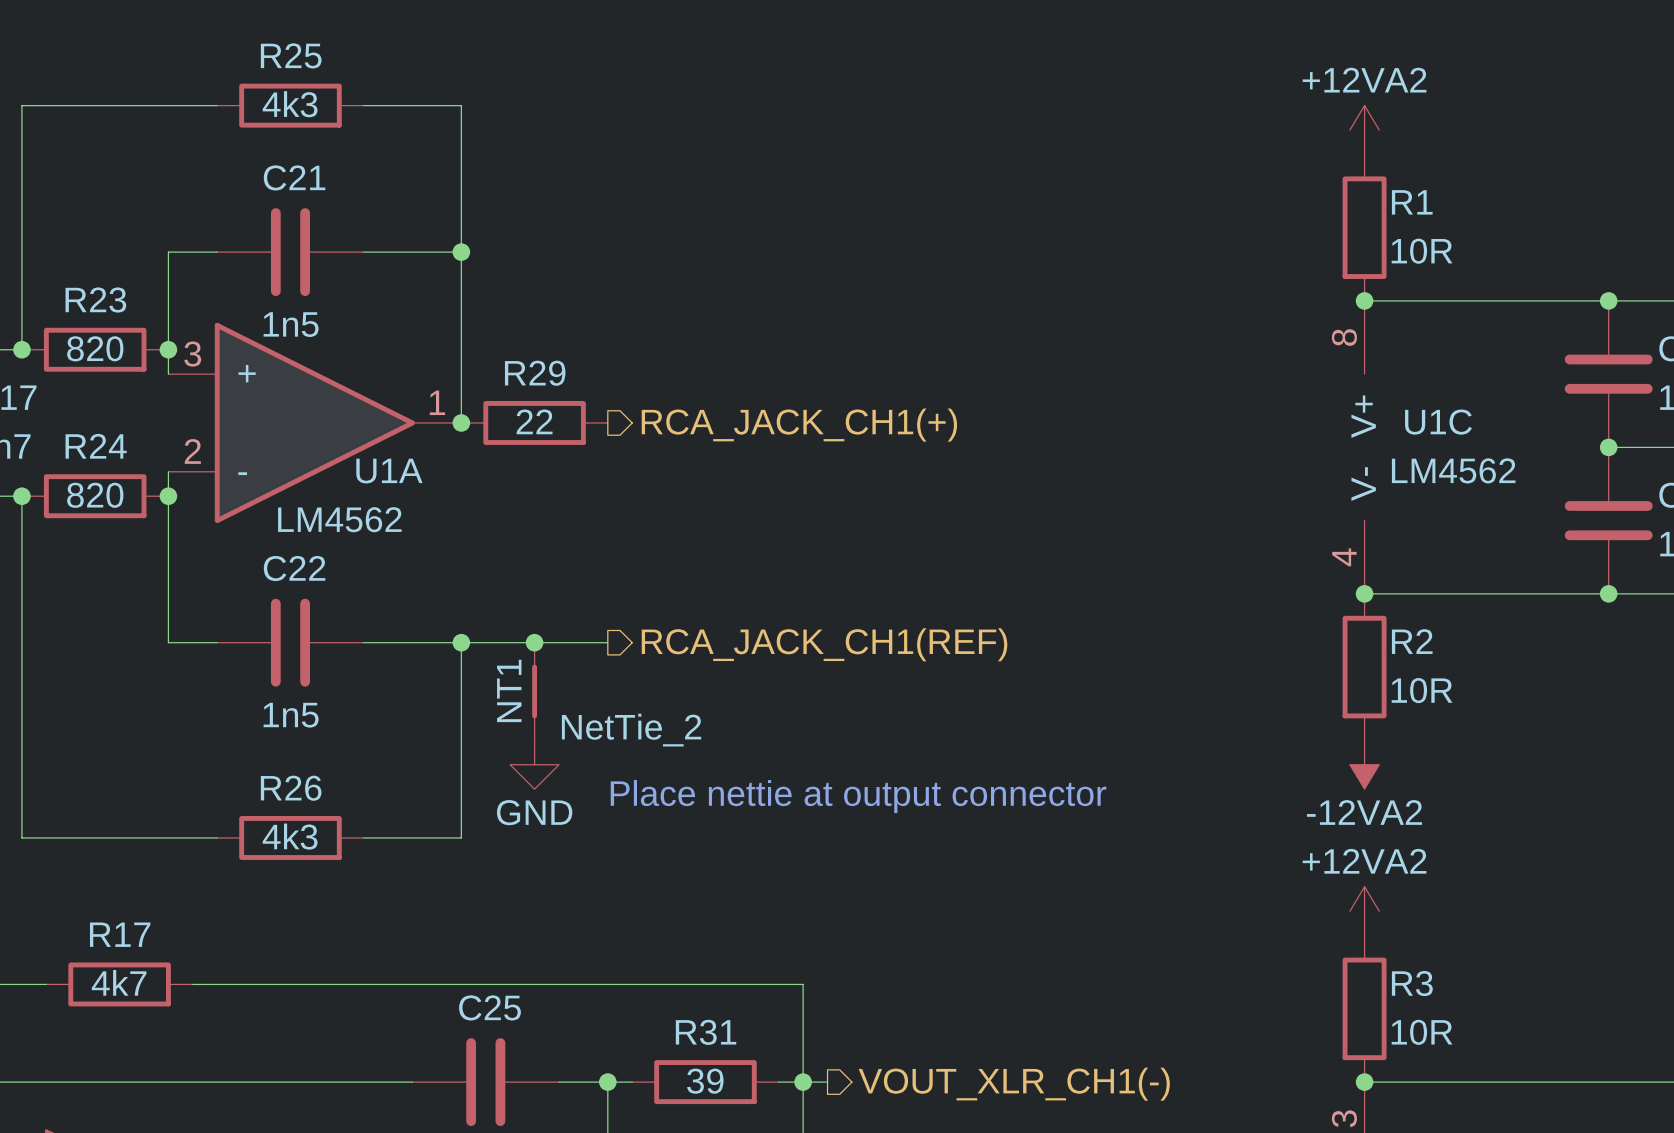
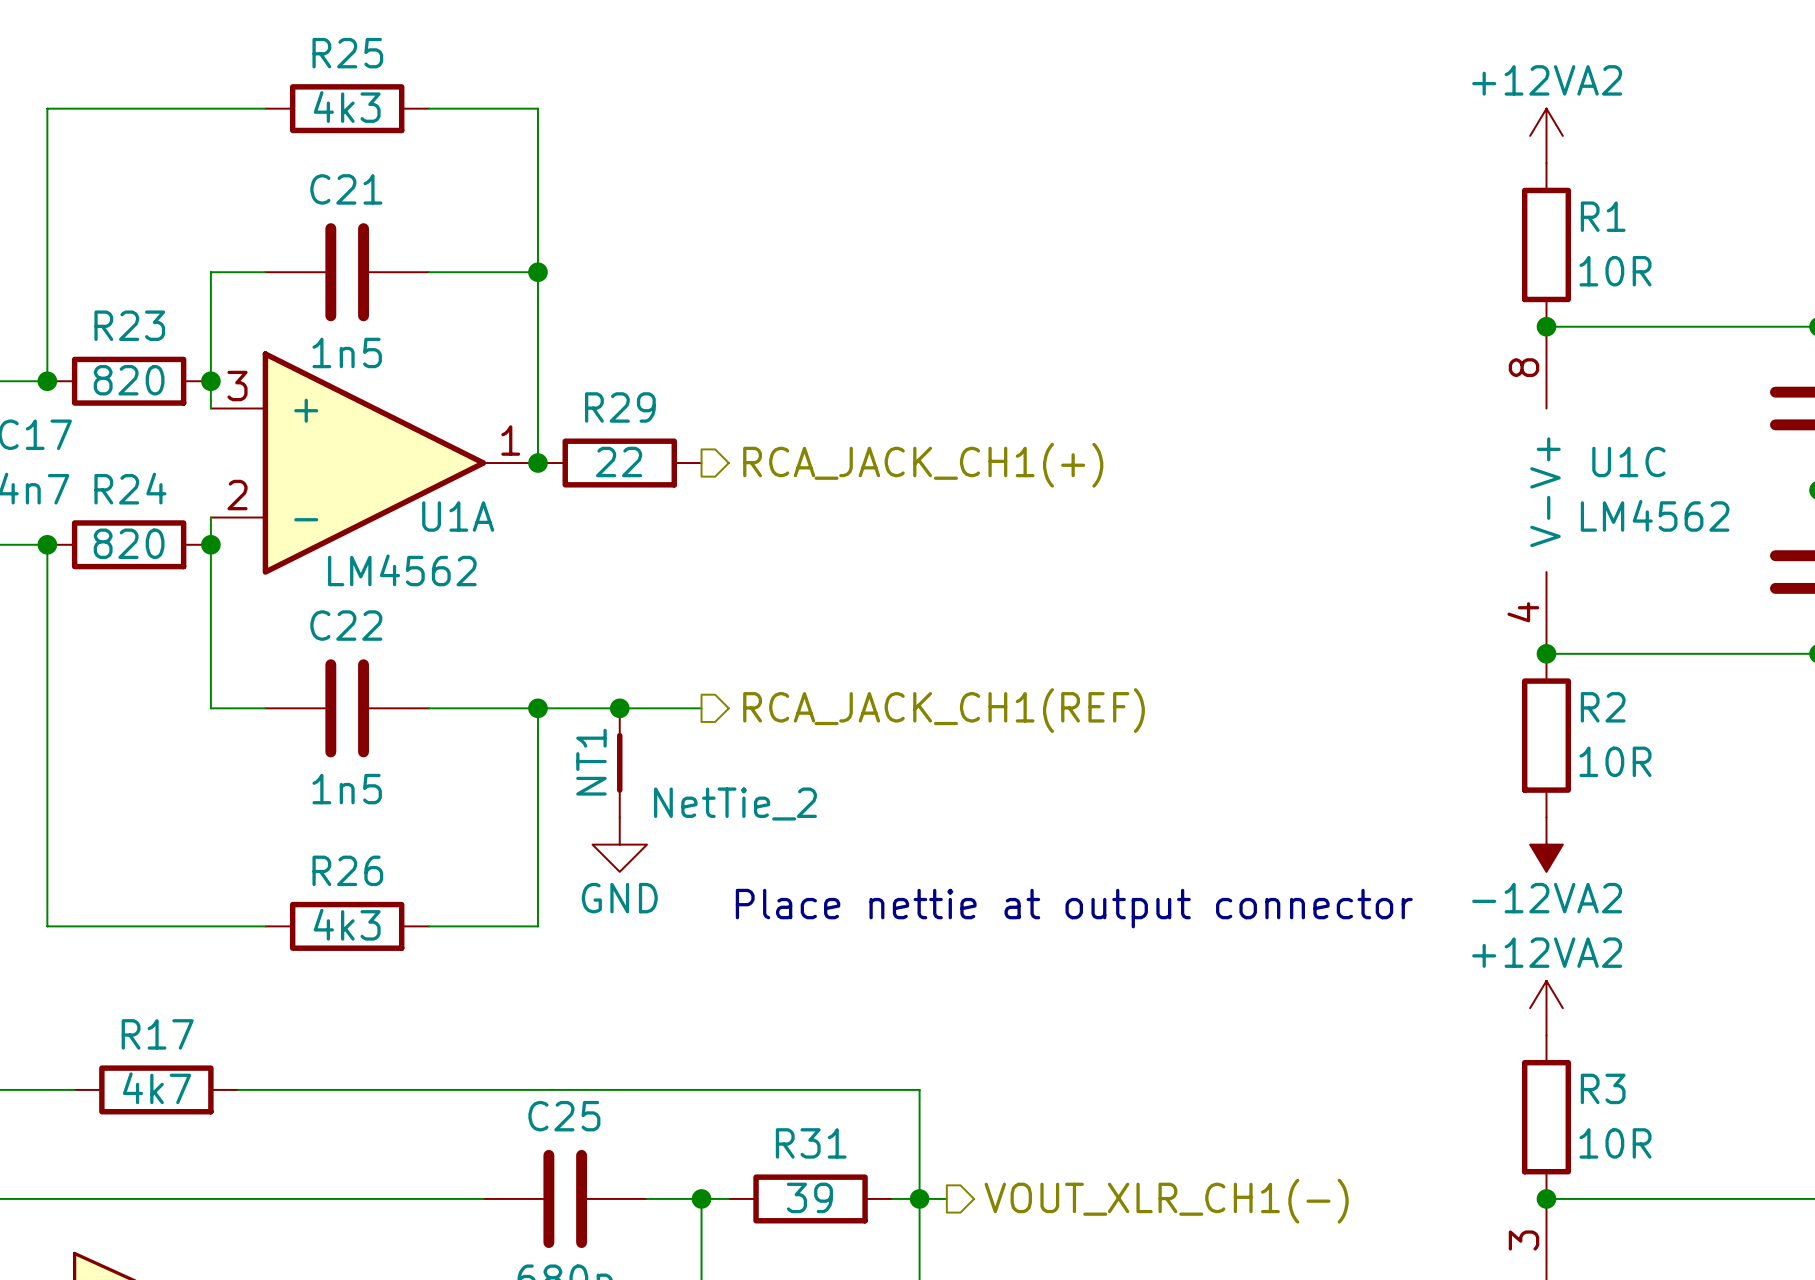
text position: Place nettie at output connector (858, 796) -> Place nettie at output connector (1074, 908)

